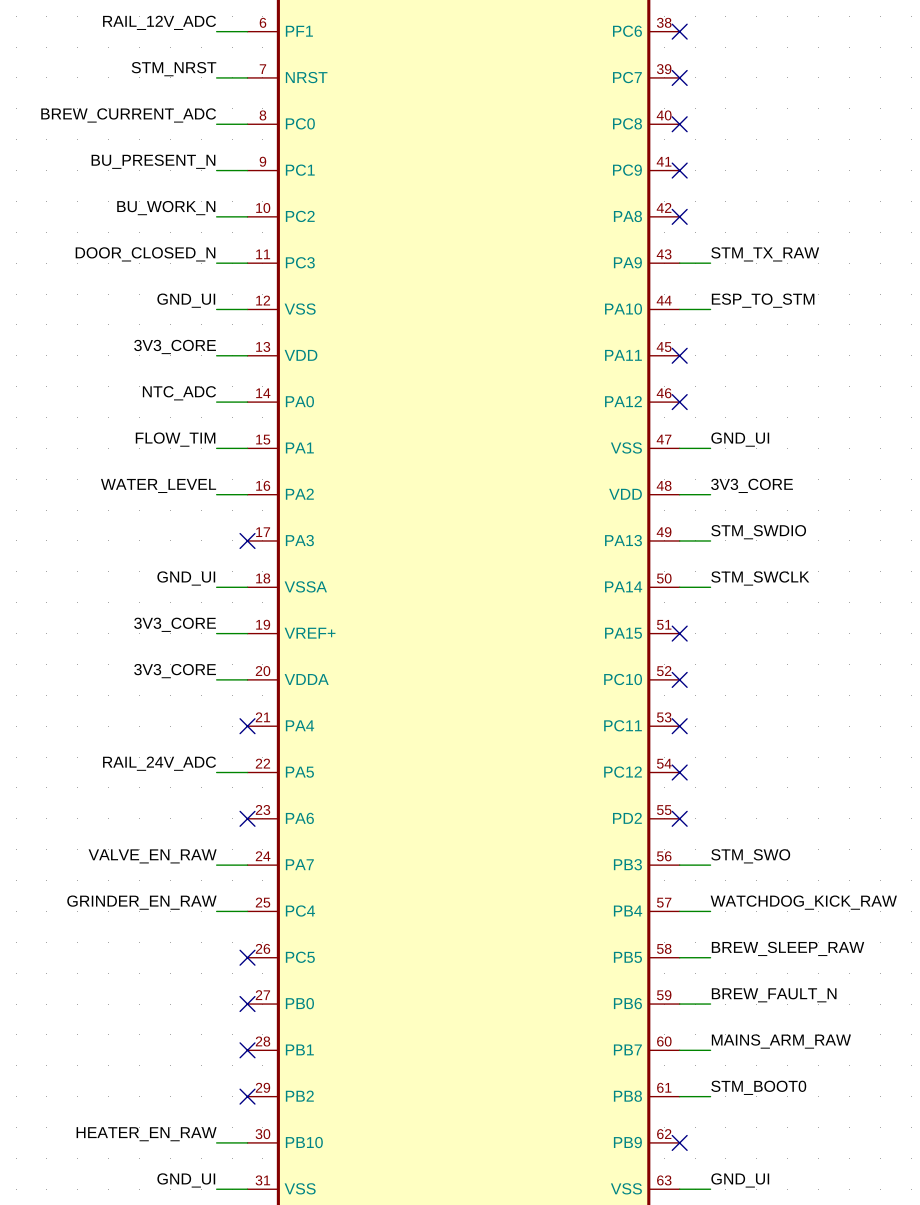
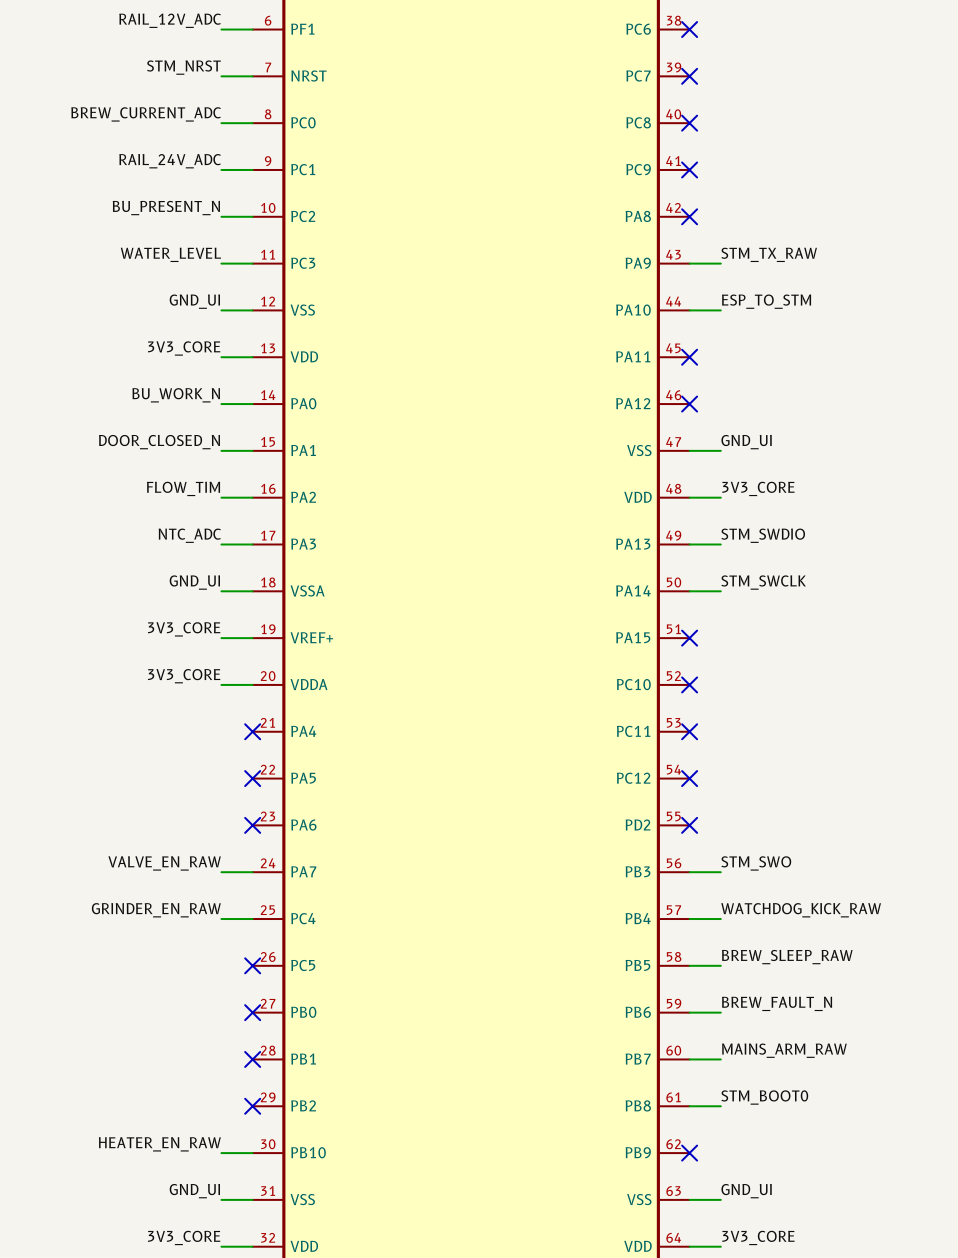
label: BU_PRESENT_N (153, 161) -> RAIL_24V_ADC (170, 161)
label: BU_WORK_N (166, 208) -> BU_PRESENT_N (166, 208)
label: DOOR_CLOSED_N (145, 254) -> WATER_LEVEL (170, 254)
label: NTC_ADC (179, 393) -> BU_WORK_N (176, 395)
label: FLOW_TIM (175, 439) -> DOOR_CLOSED_N (159, 442)
label: WATER_LEVEL (158, 485) -> FLOW_TIM (183, 488)
label: none -> NTC_ADC (189, 535)
no-connect mark: (247, 540) -> none
label: RAIL_24V_ADC (159, 763) -> none
wire: (216, 772) (247, 772) -> (221, 544) (252, 544)
no-connect mark: none -> (252, 778)

